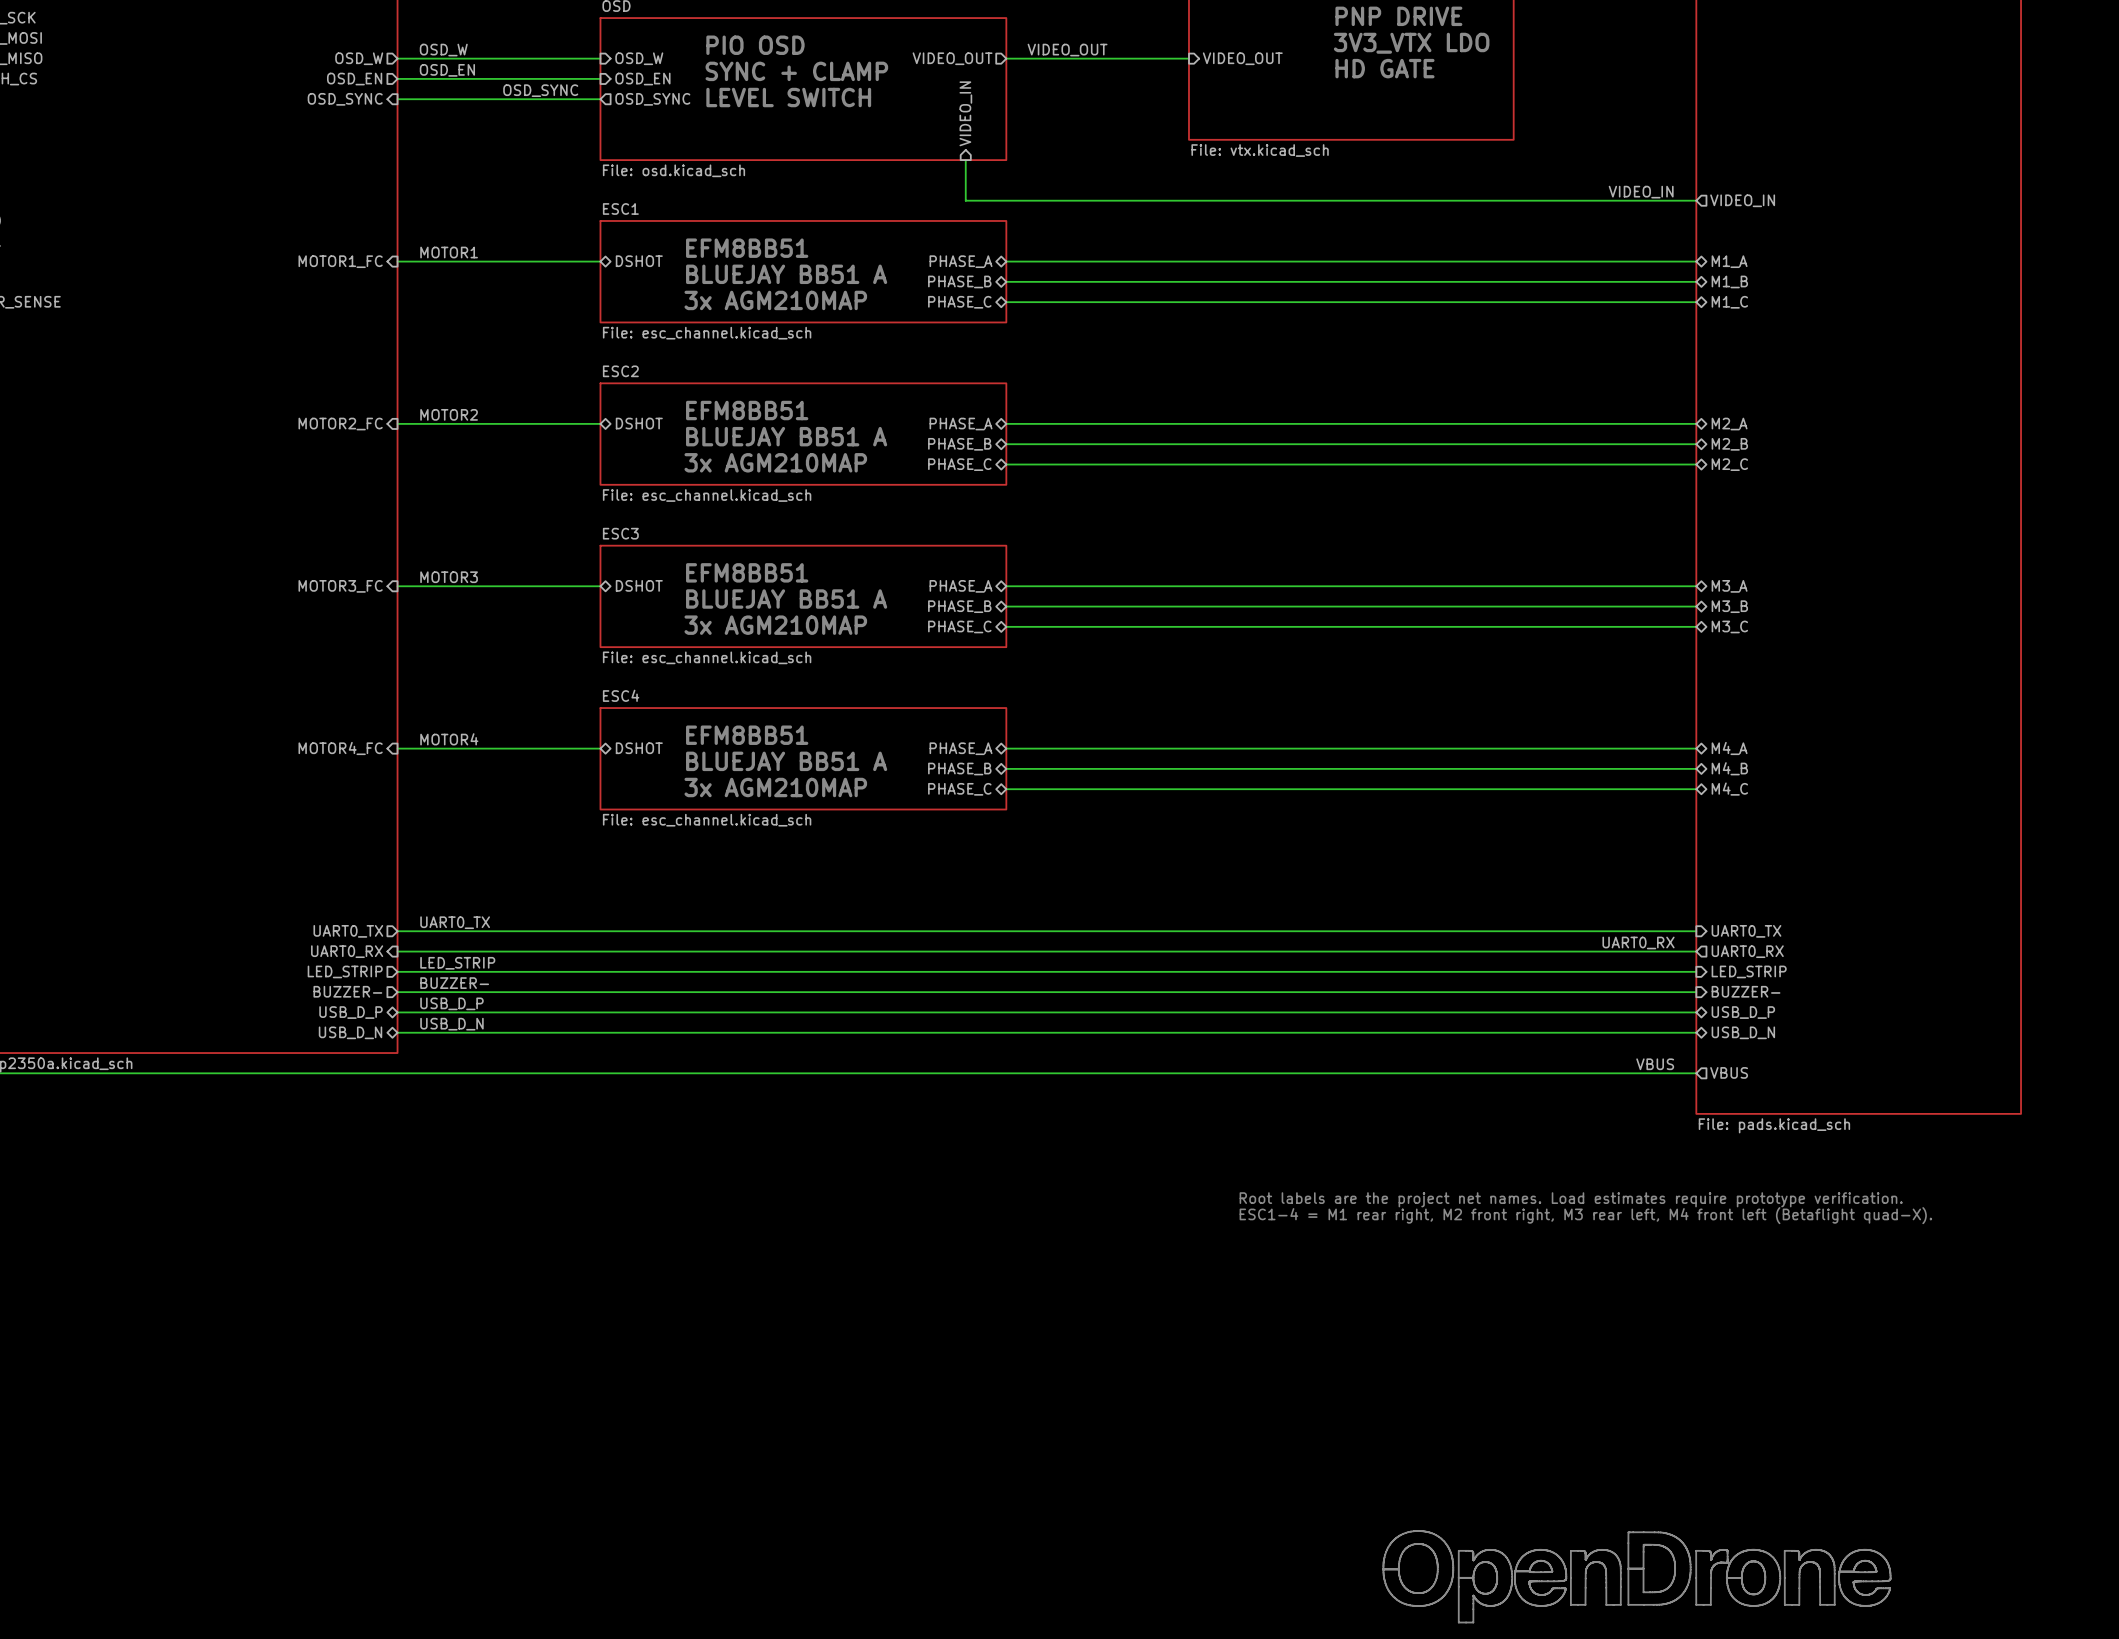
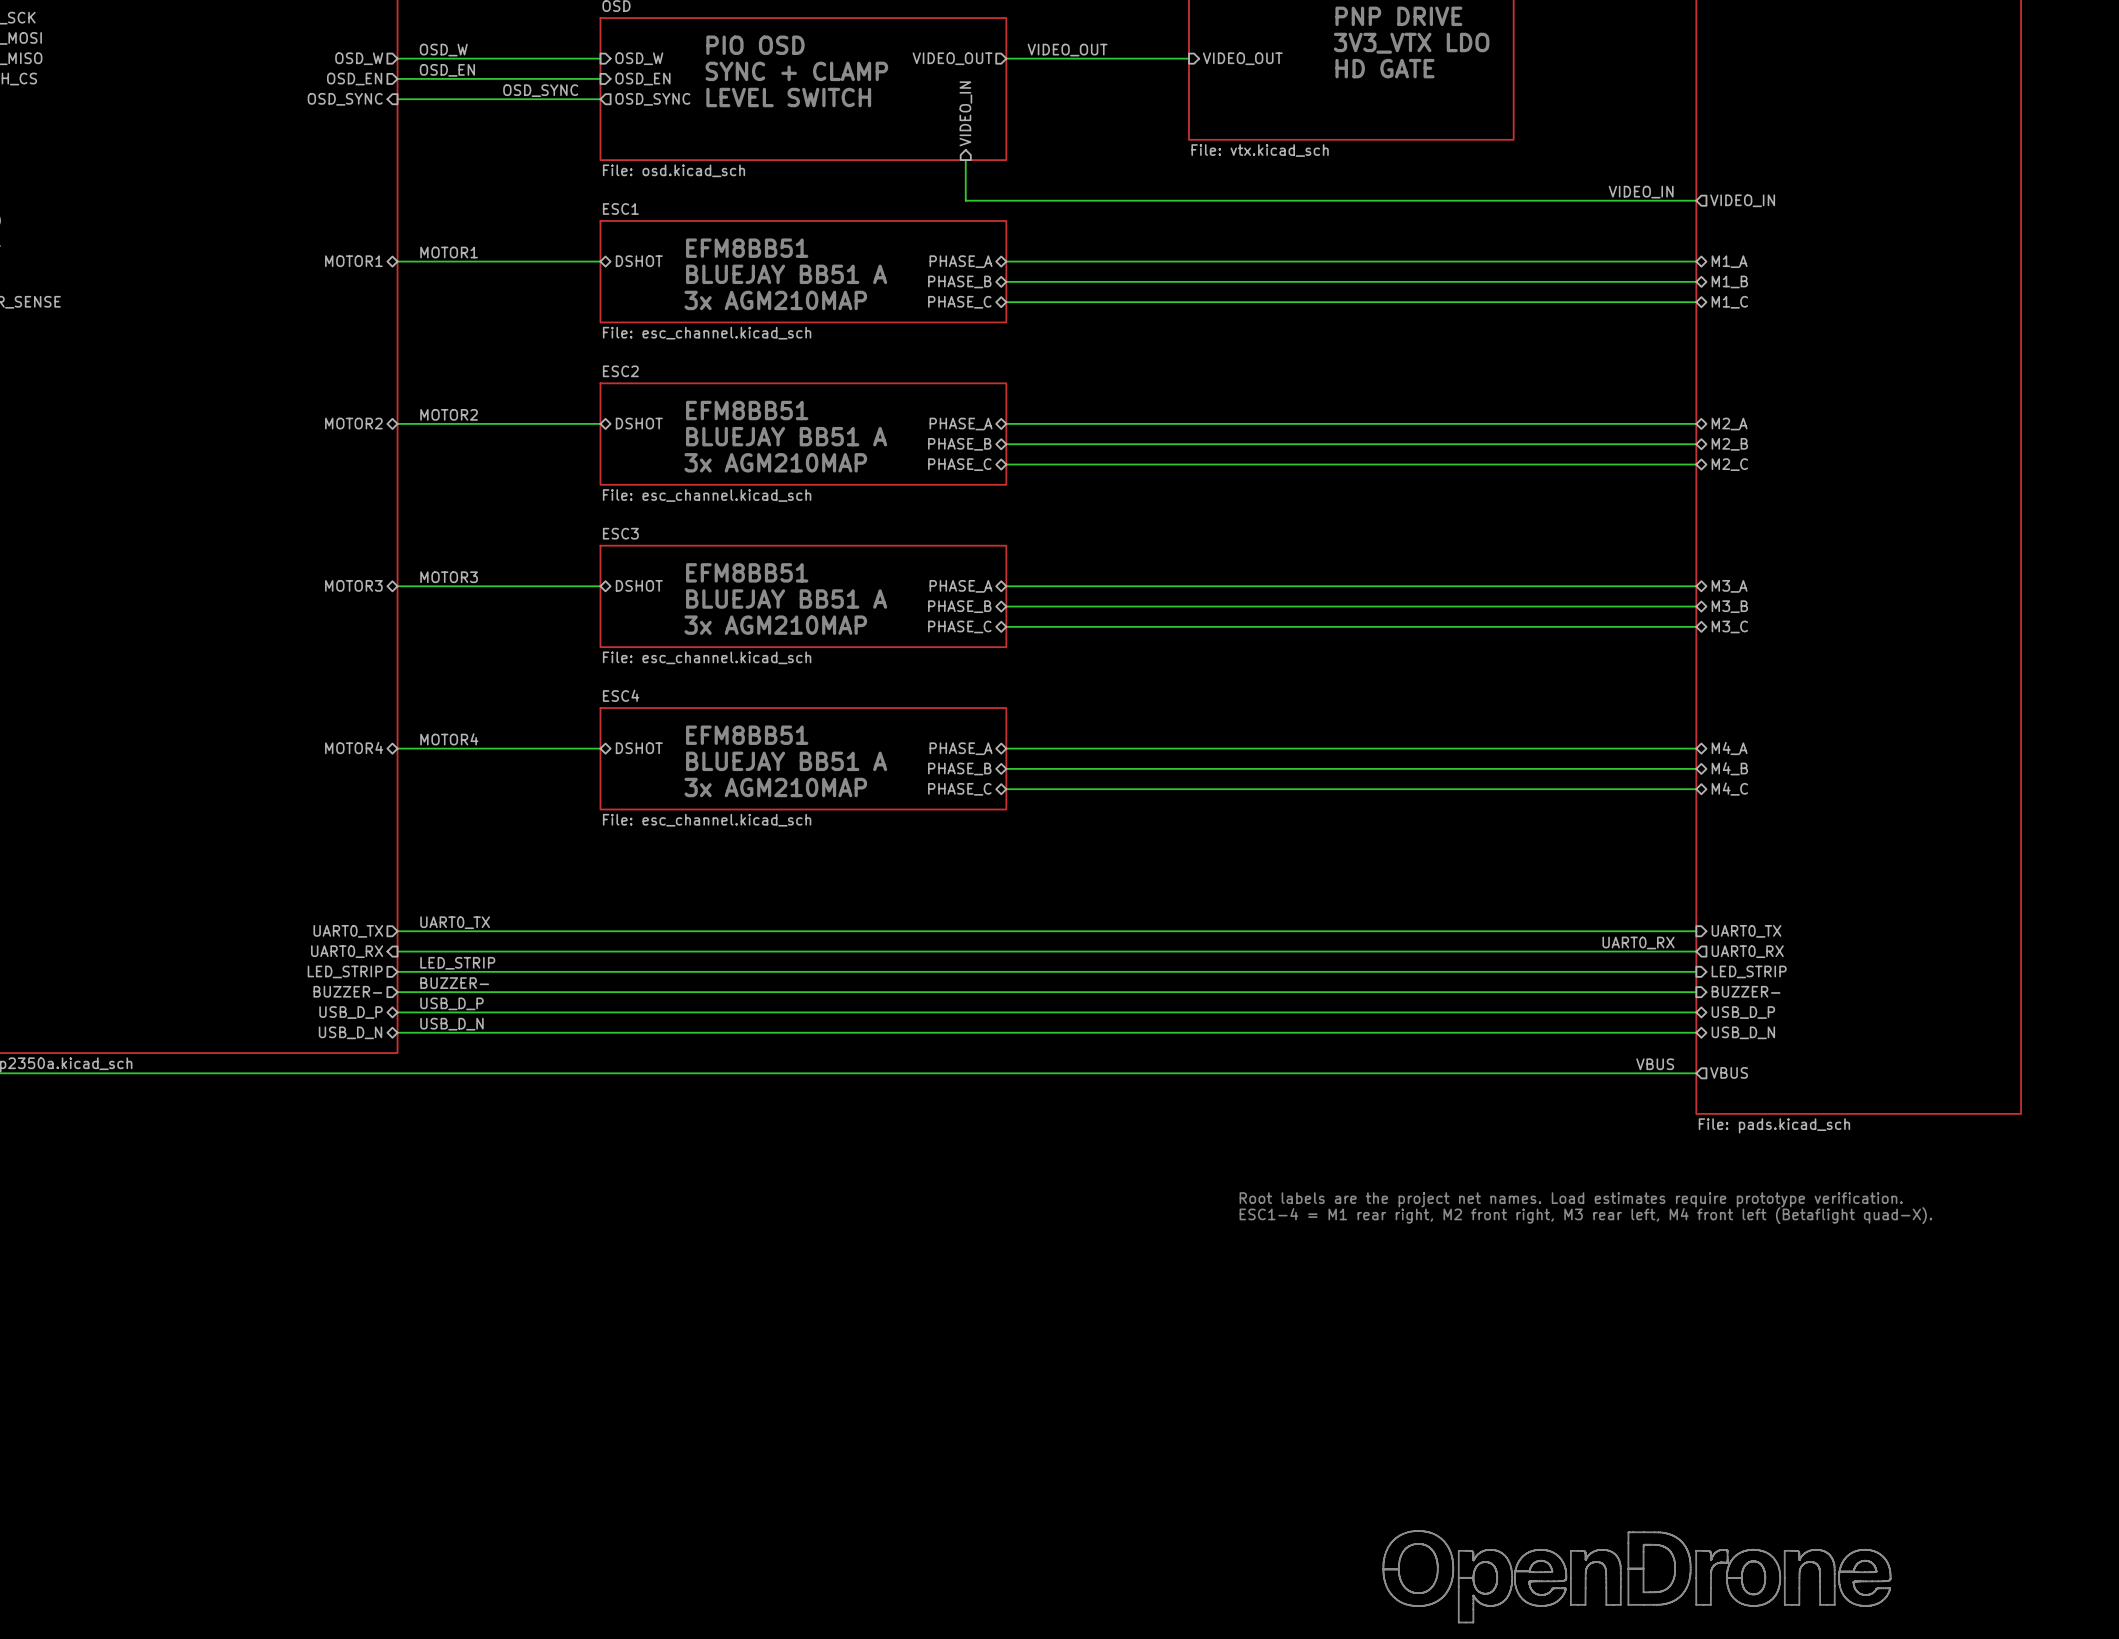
sheet pin shape: input (340, 261) -> bidirectional (353, 261)
sheet pin: MOTOR1_FC (340, 261) -> MOTOR1 (353, 261)
sheet pin shape: input (340, 424) -> bidirectional (353, 423)
sheet pin: MOTOR2_FC (340, 424) -> MOTOR2 (353, 423)
sheet pin shape: input (340, 586) -> bidirectional (353, 585)
sheet pin: MOTOR3_FC (340, 586) -> MOTOR3 (353, 585)
sheet pin shape: input (340, 748) -> bidirectional (354, 748)
sheet pin: MOTOR4_FC (340, 748) -> MOTOR4 (354, 748)

